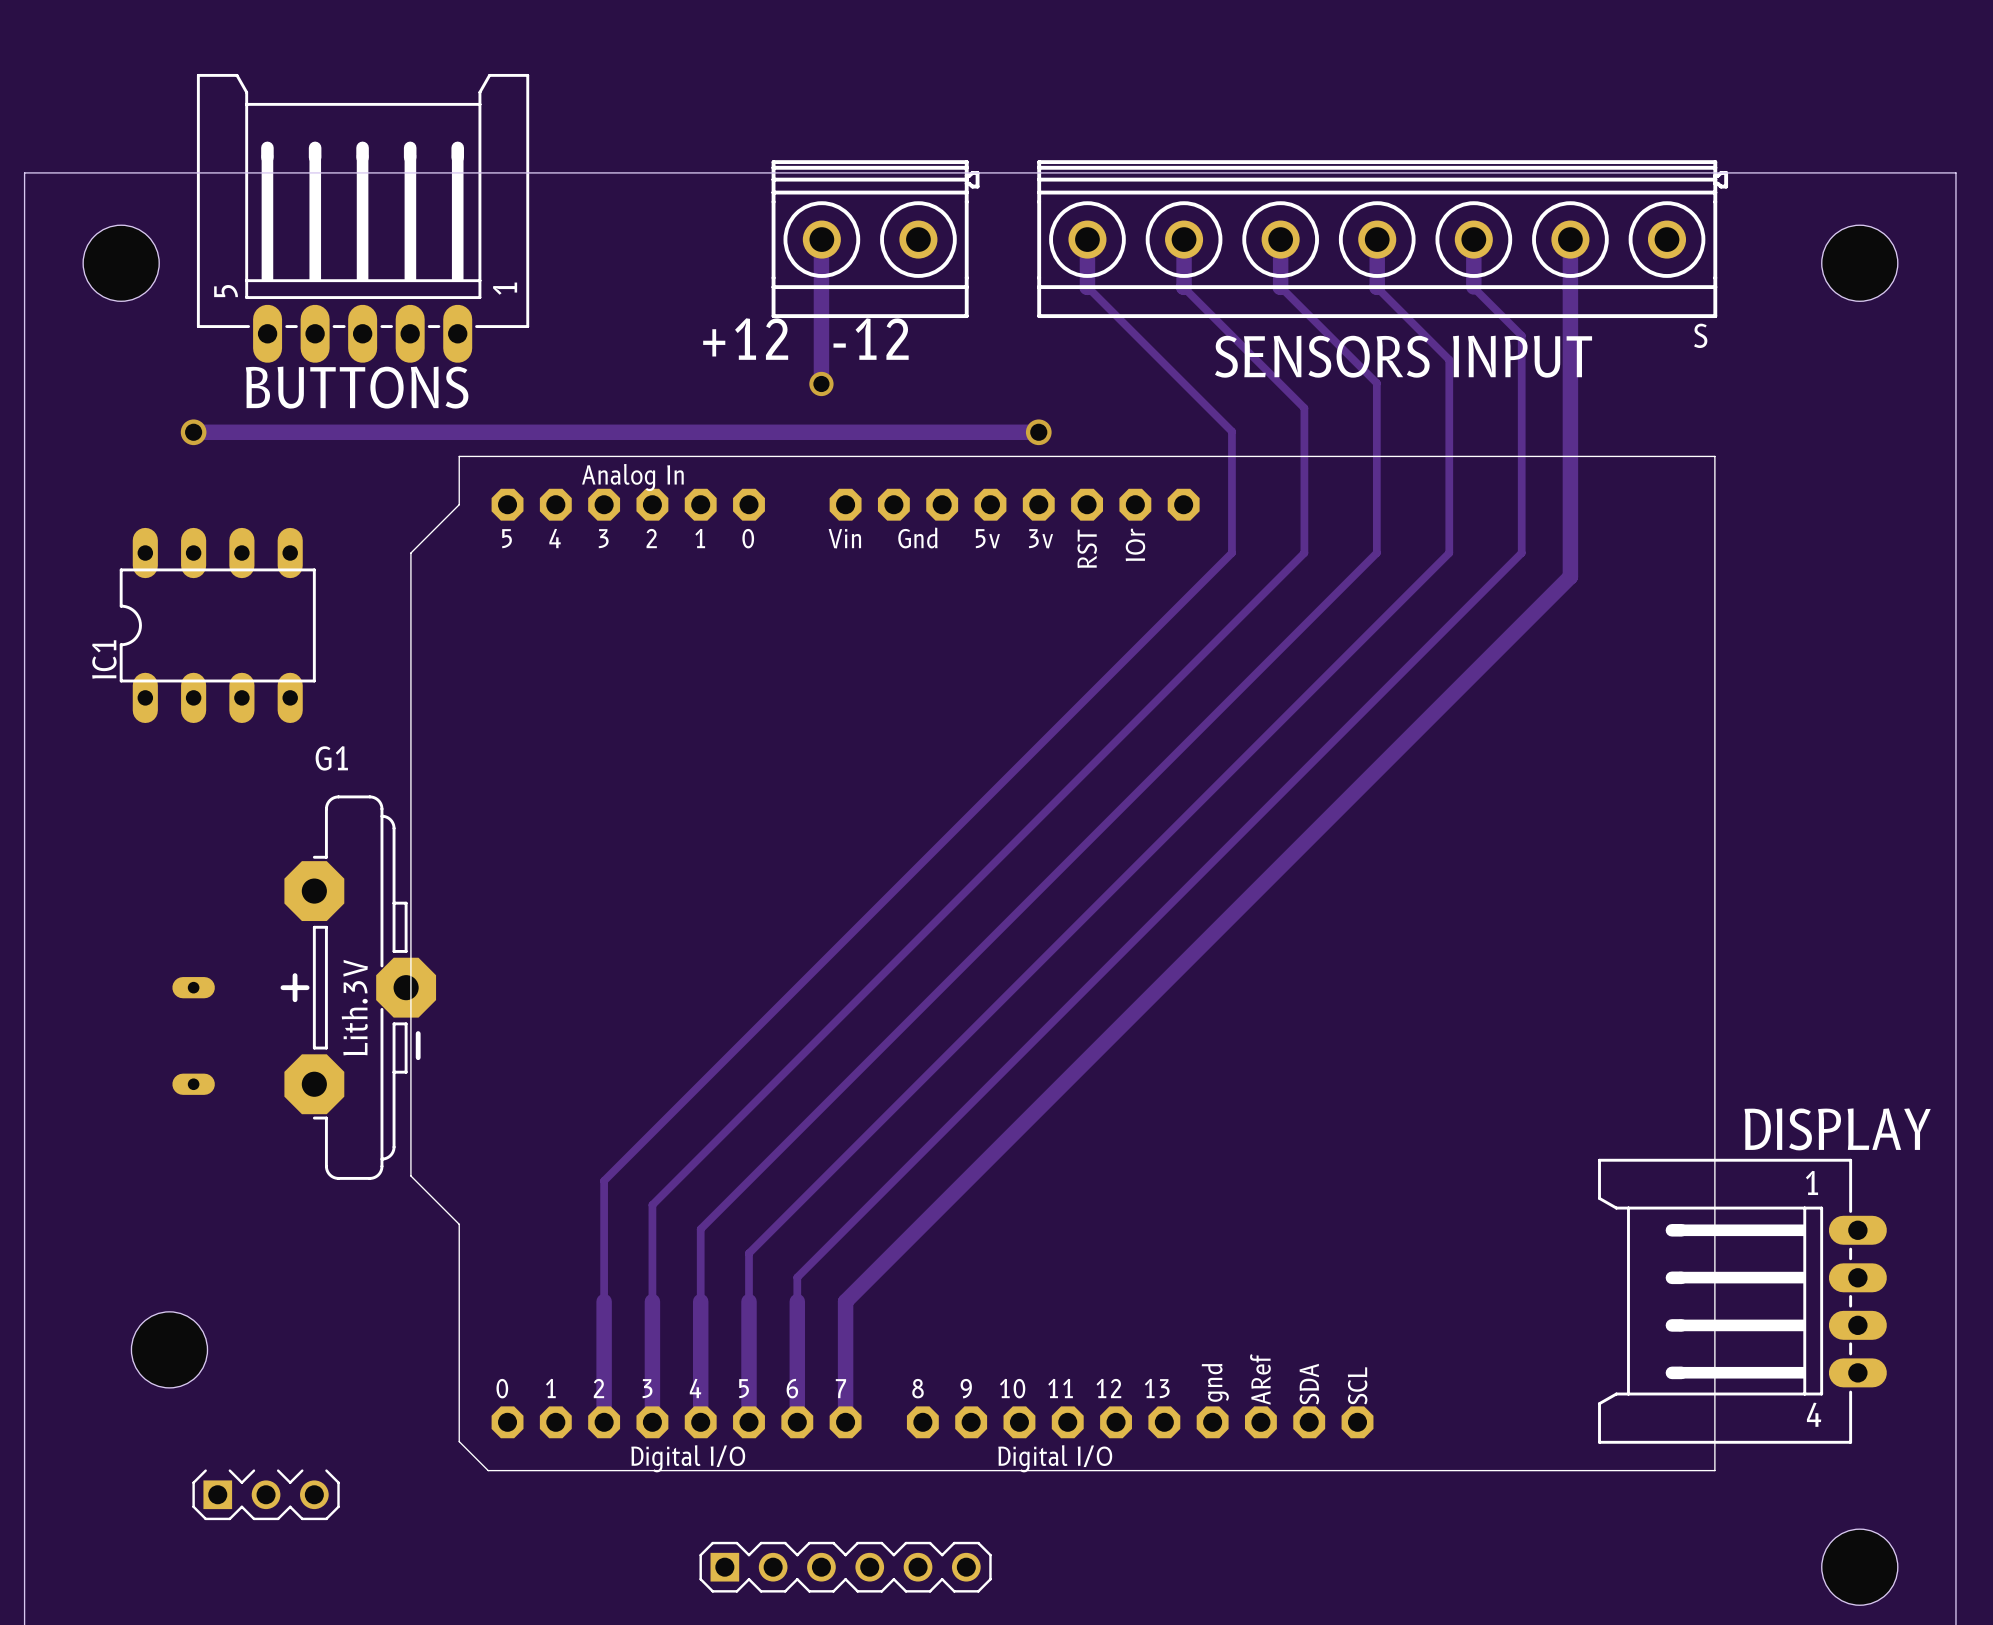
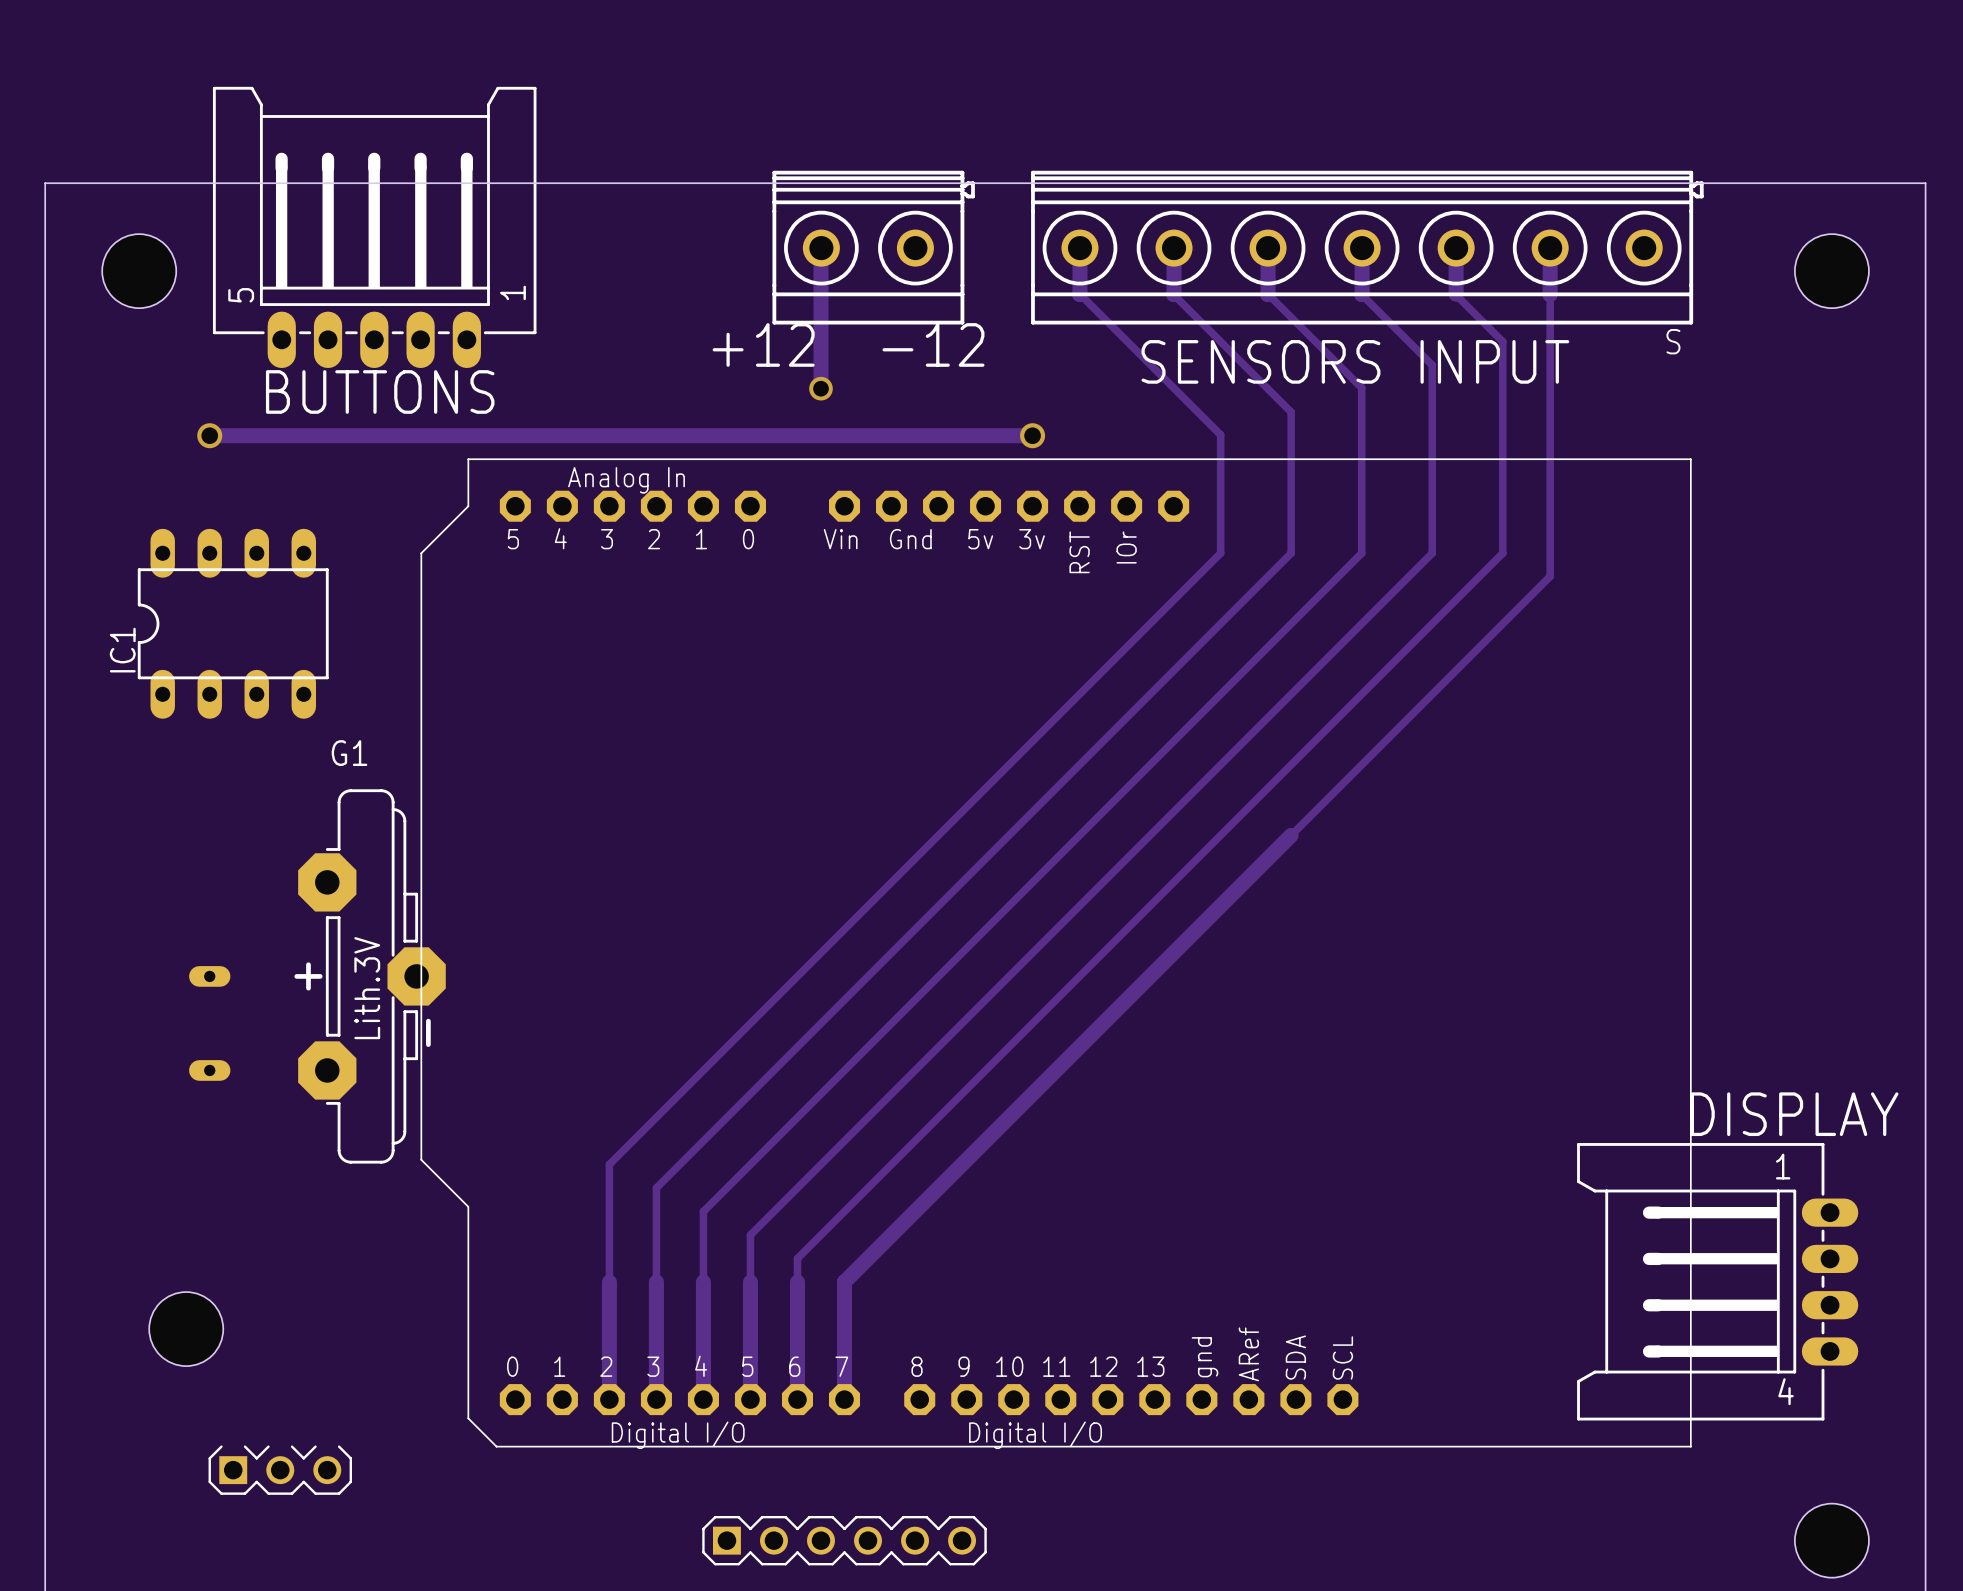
track width: thick (1570, 286) (1570, 576) (1304, 842) -> thin (1550, 294) (1550, 576) (1291, 835)

